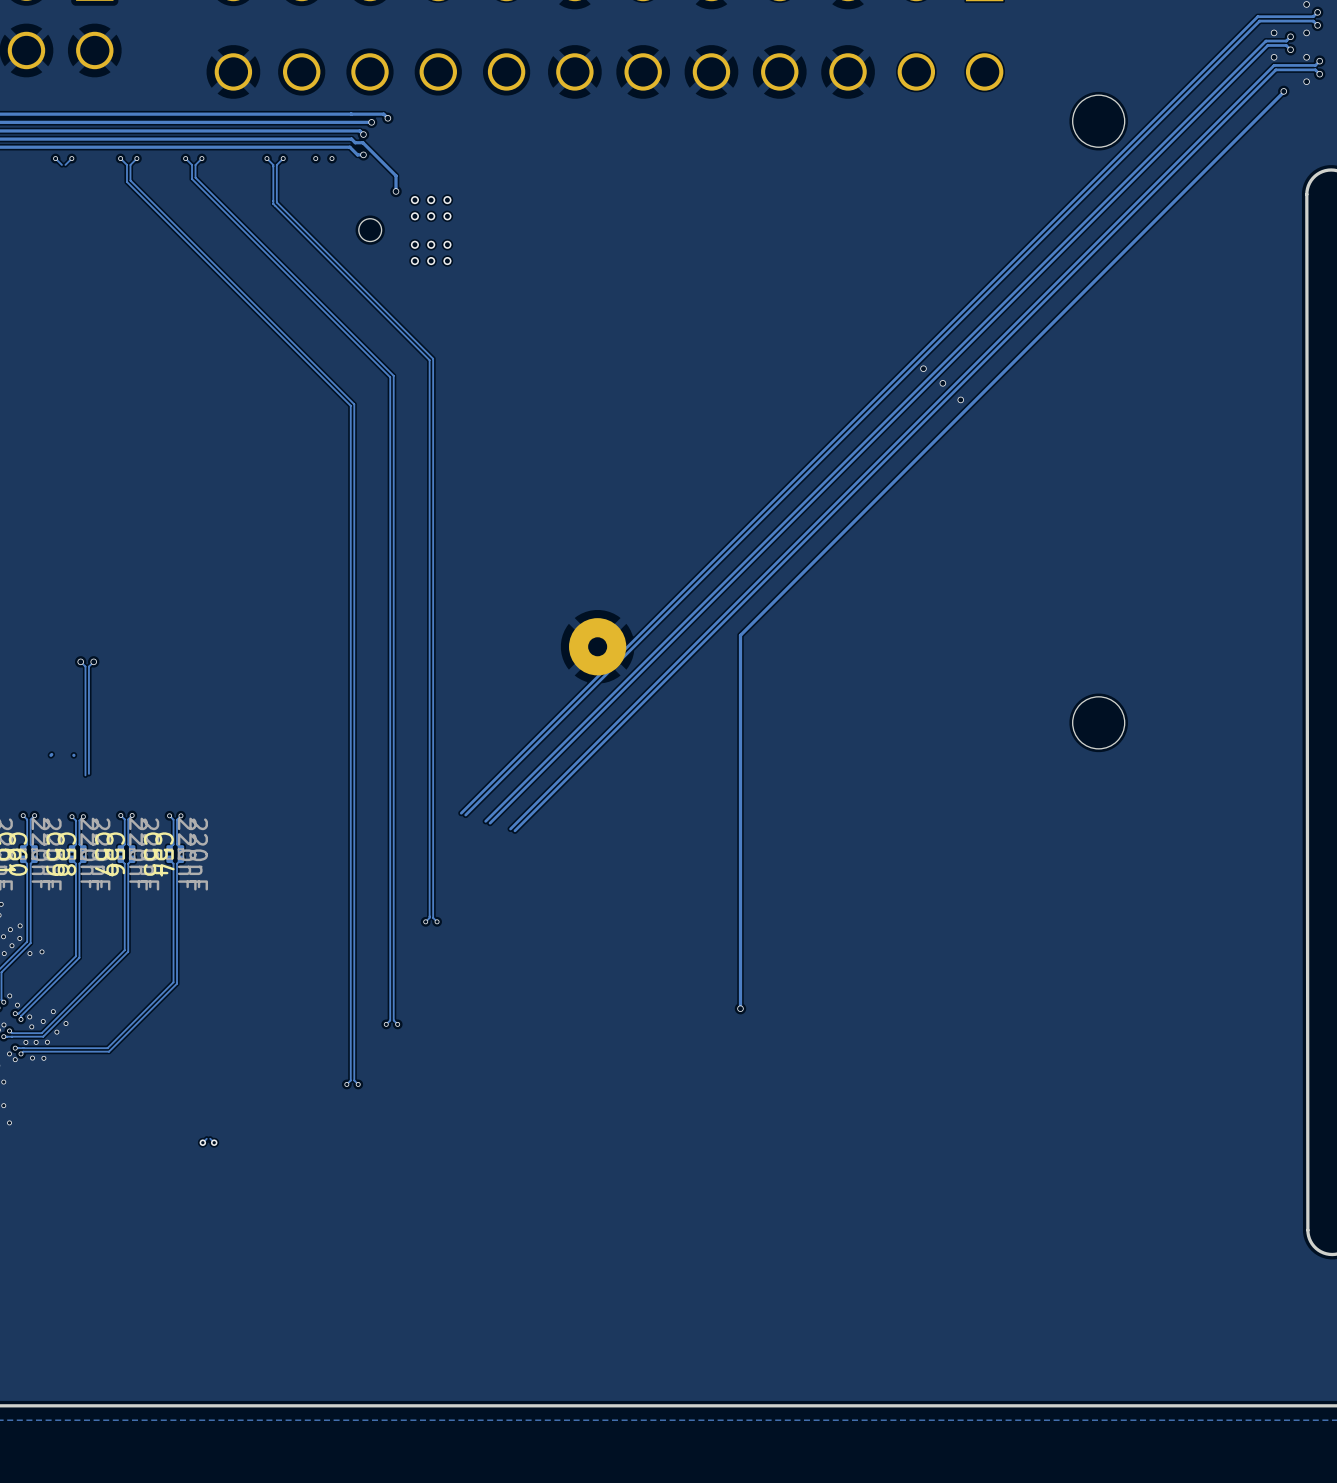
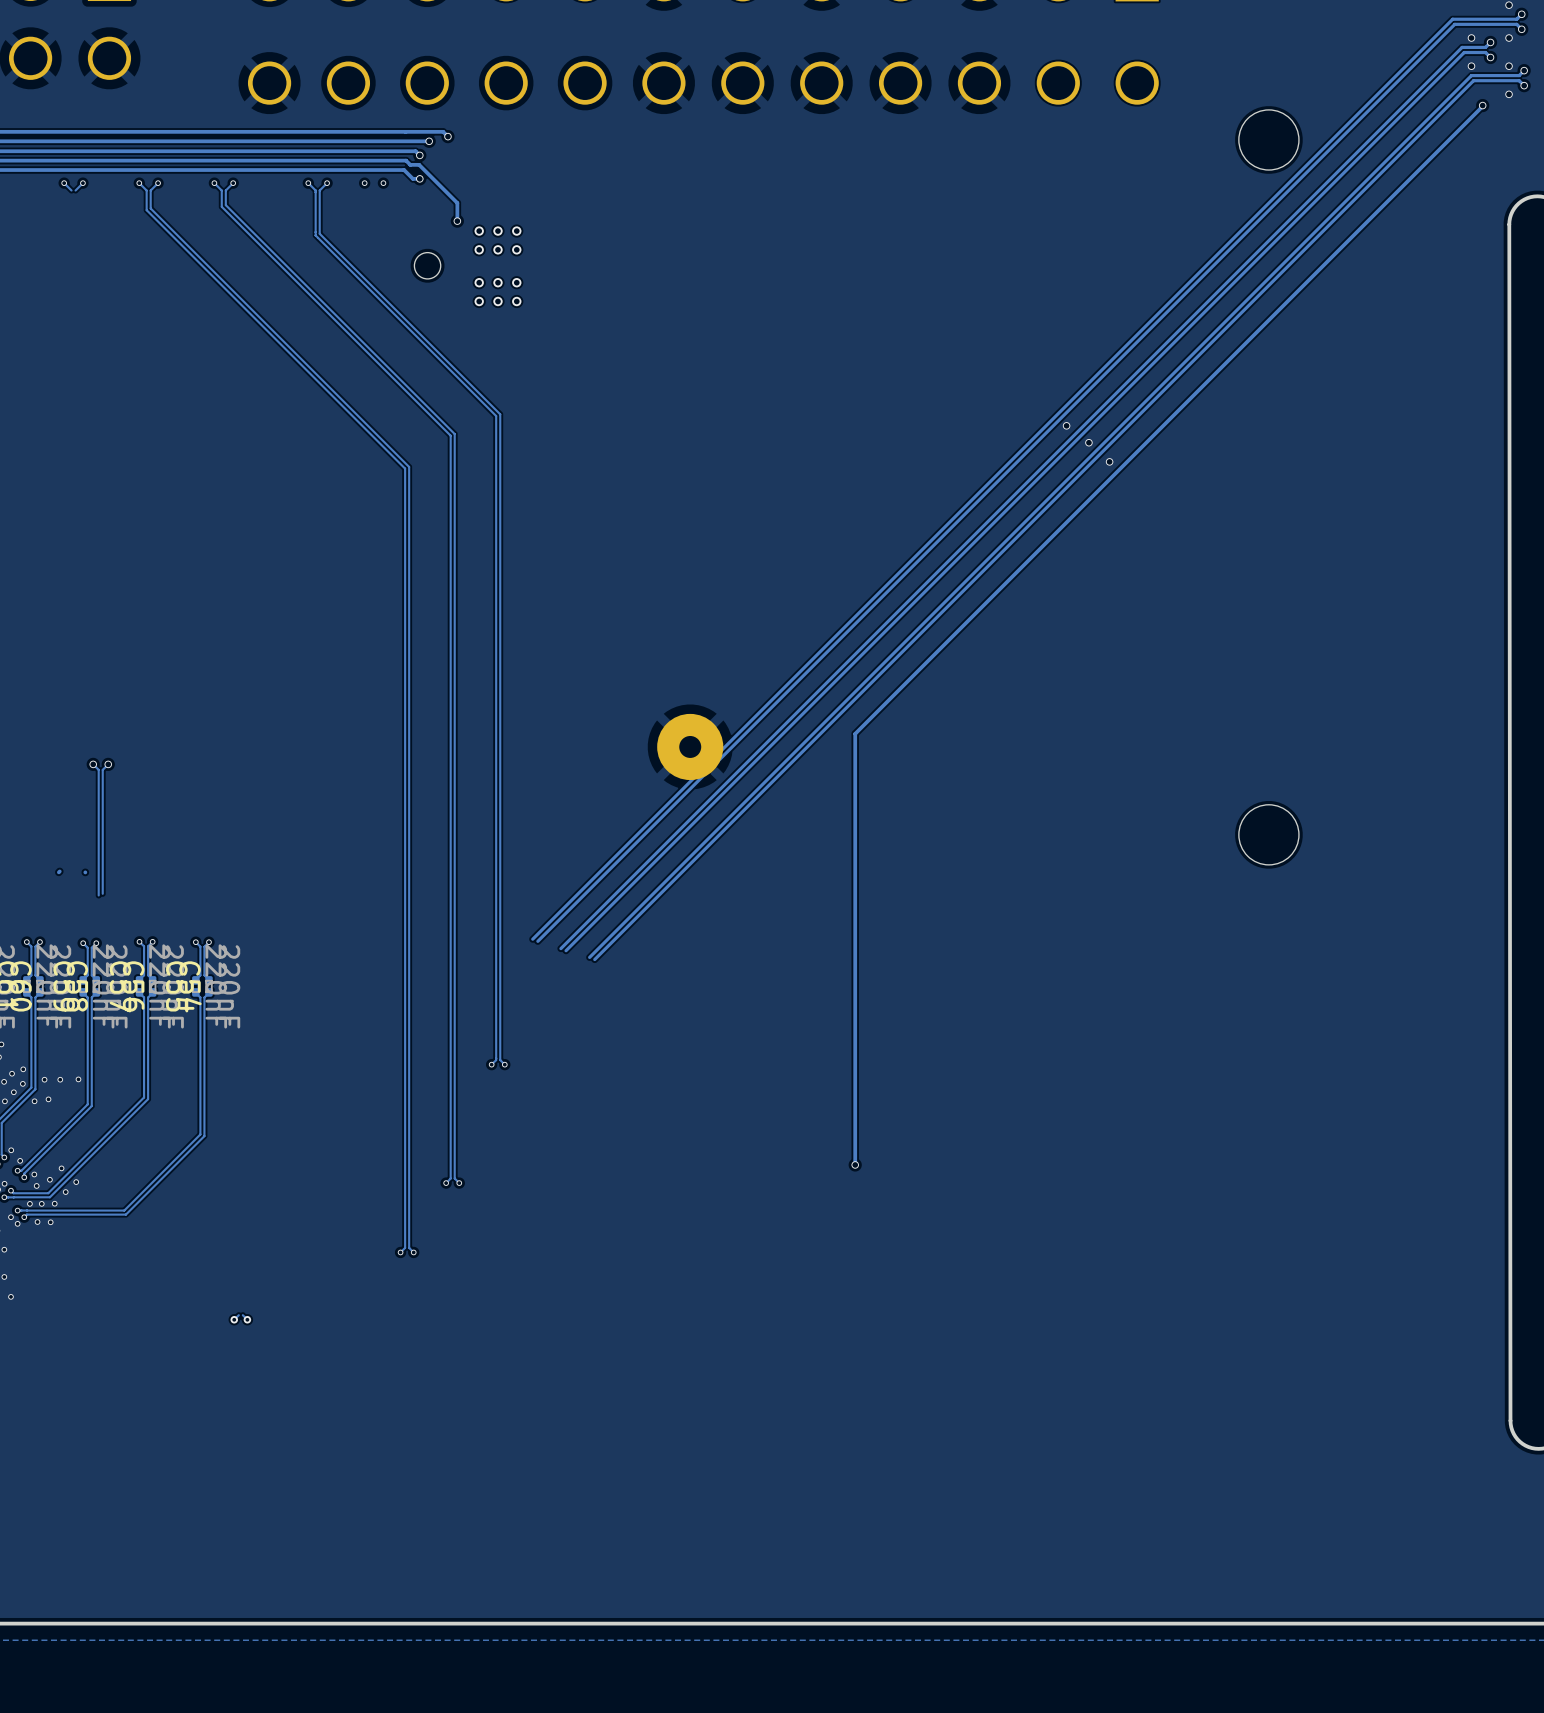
via: none -> (44, 1079)
via: none -> (60, 1079)
via: none -> (78, 1079)

